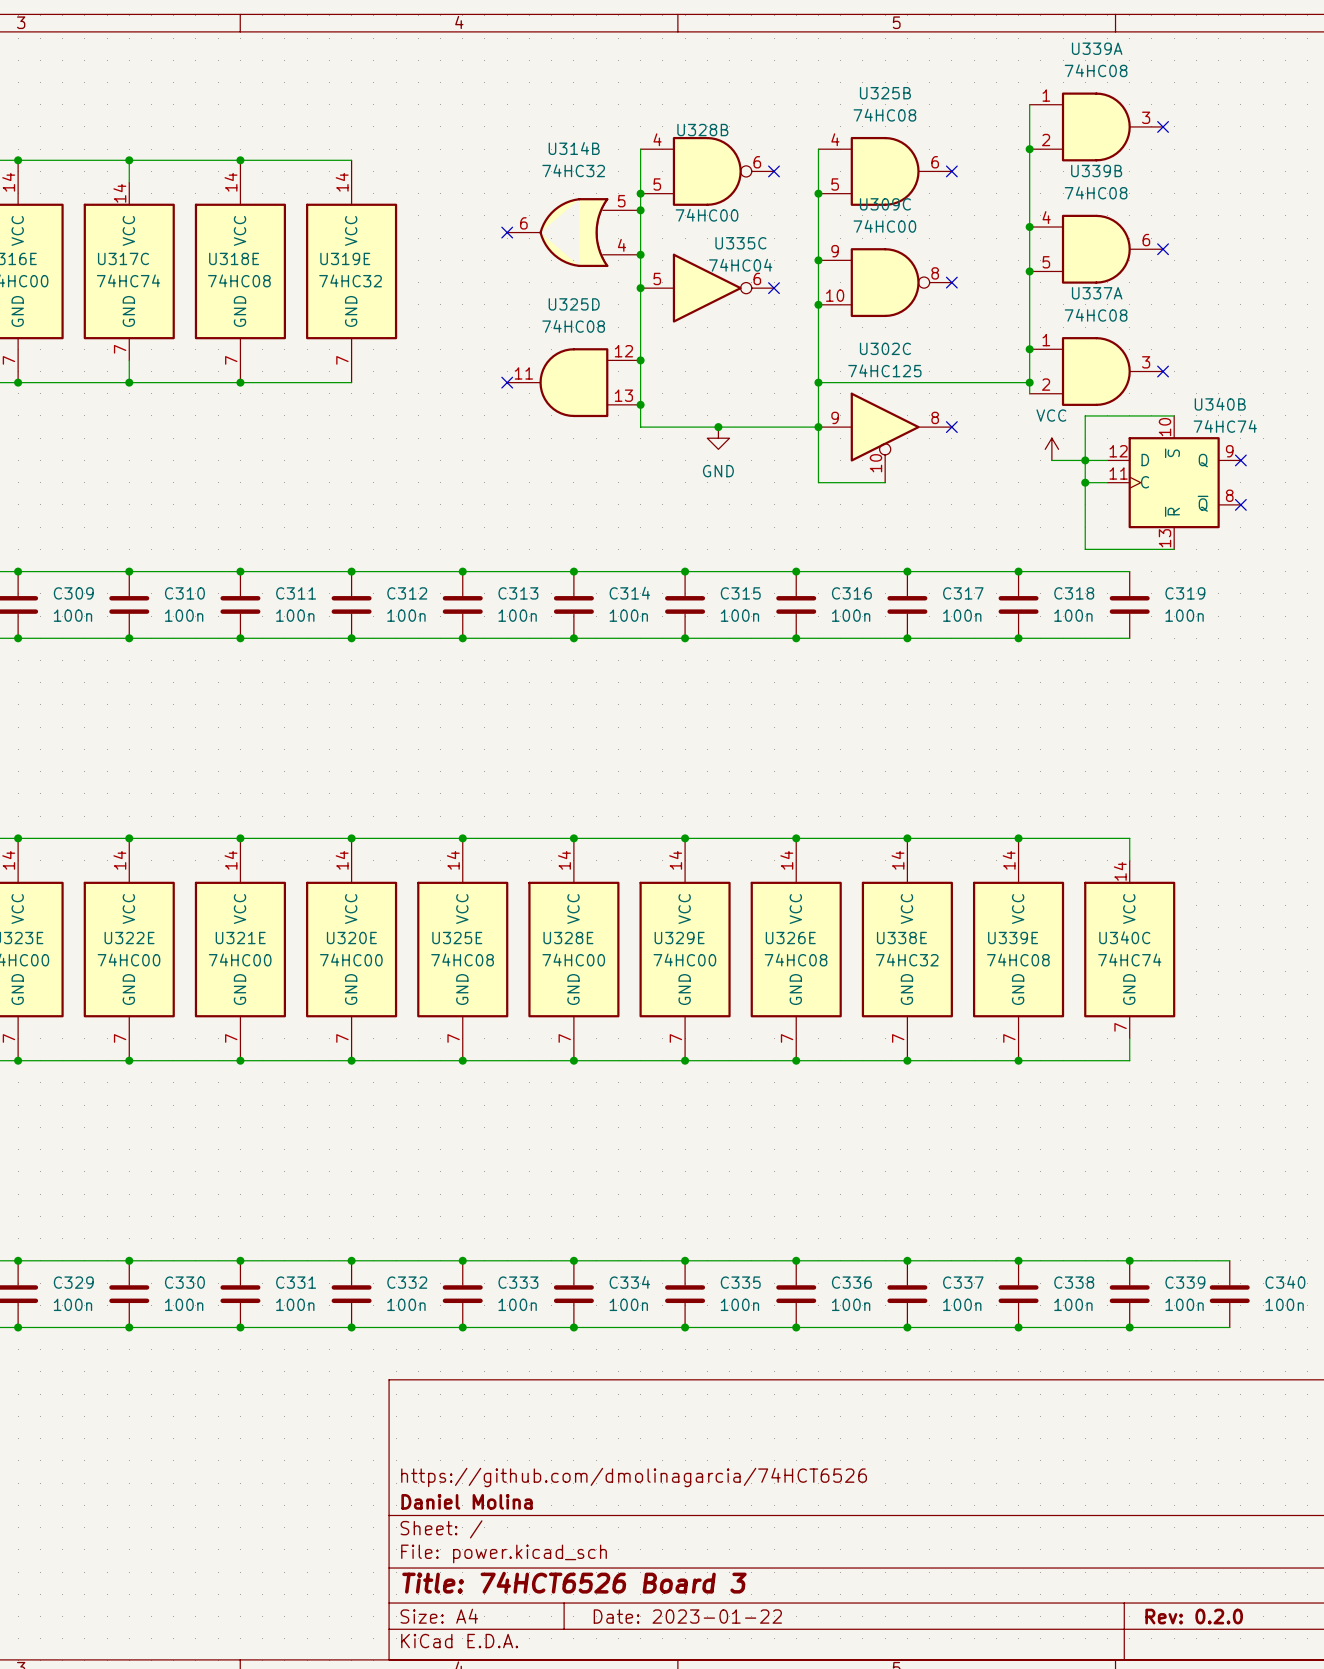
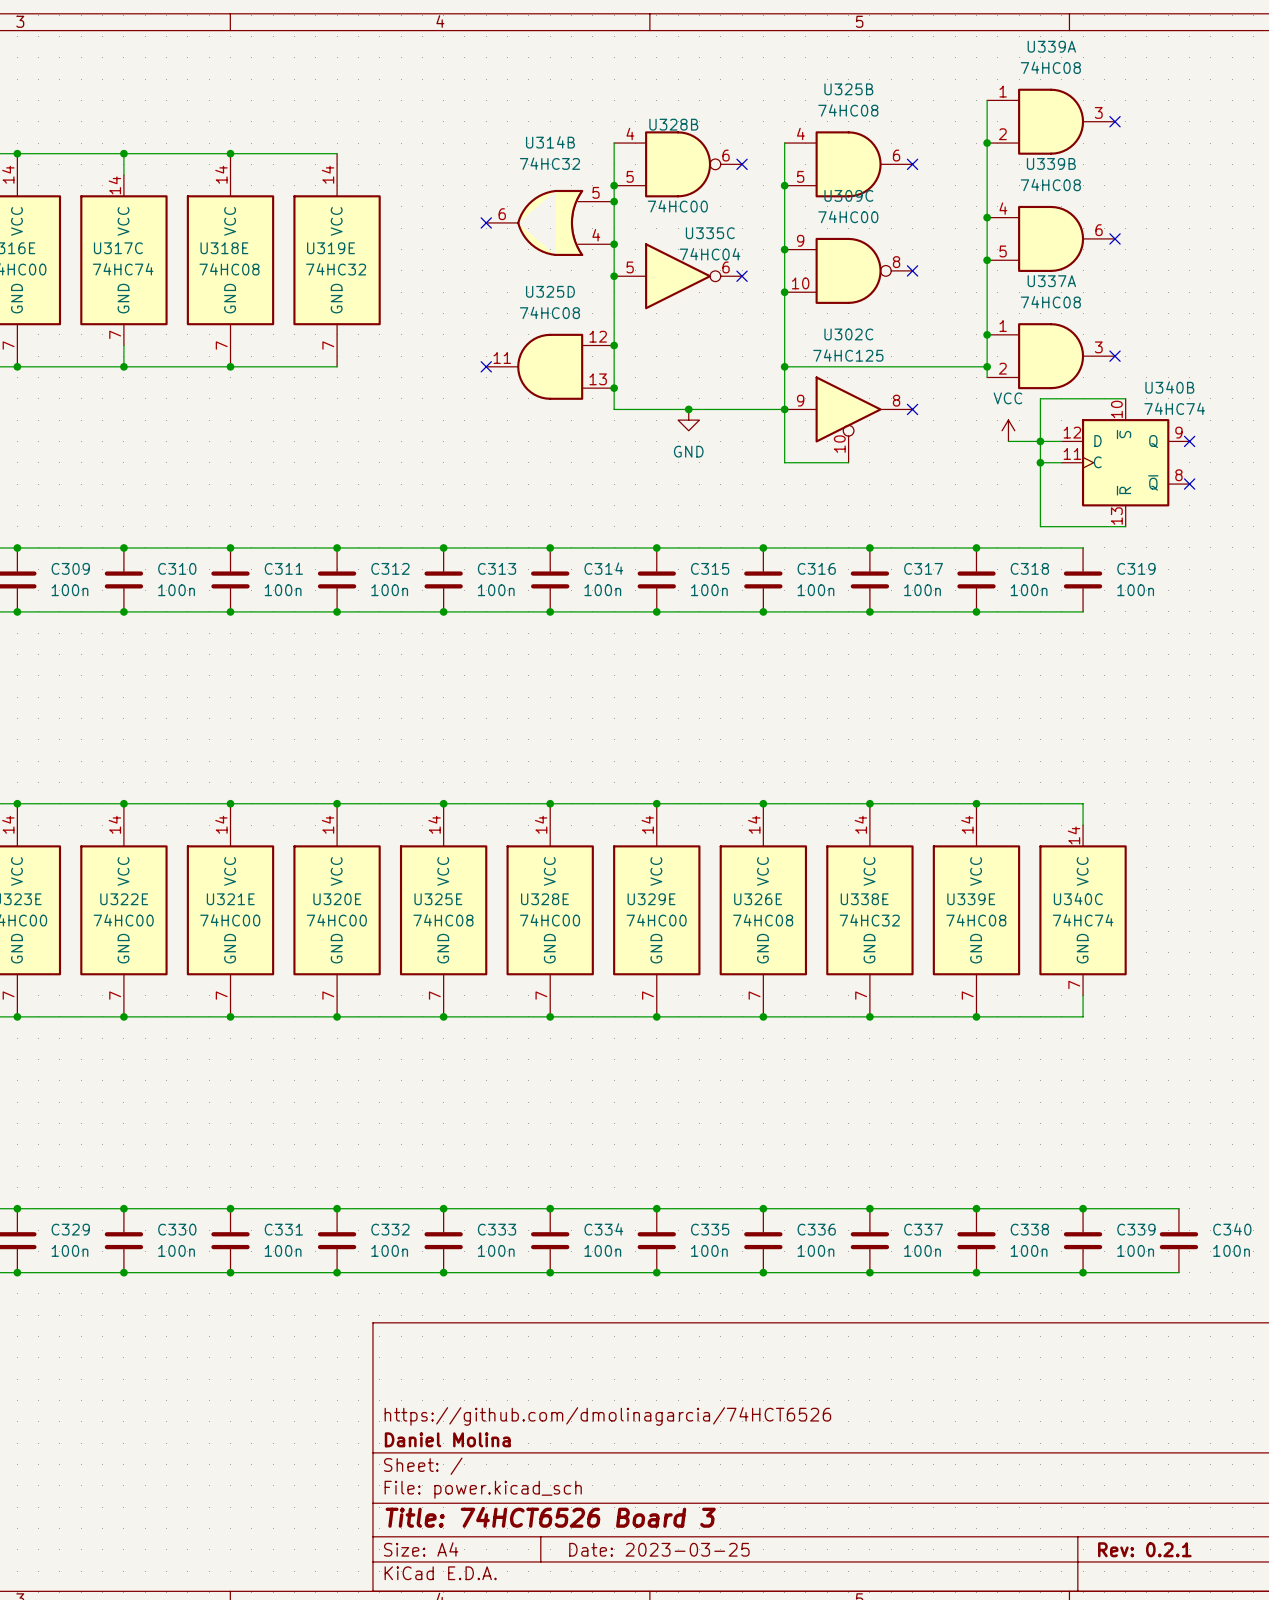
title block: Date: 2023-01-22 (687, 1616) -> Date: 2023-03-25 (659, 1549)
title block: Rev: 0.2.0 (1194, 1616) -> Rev: 0.2.1 (1144, 1549)

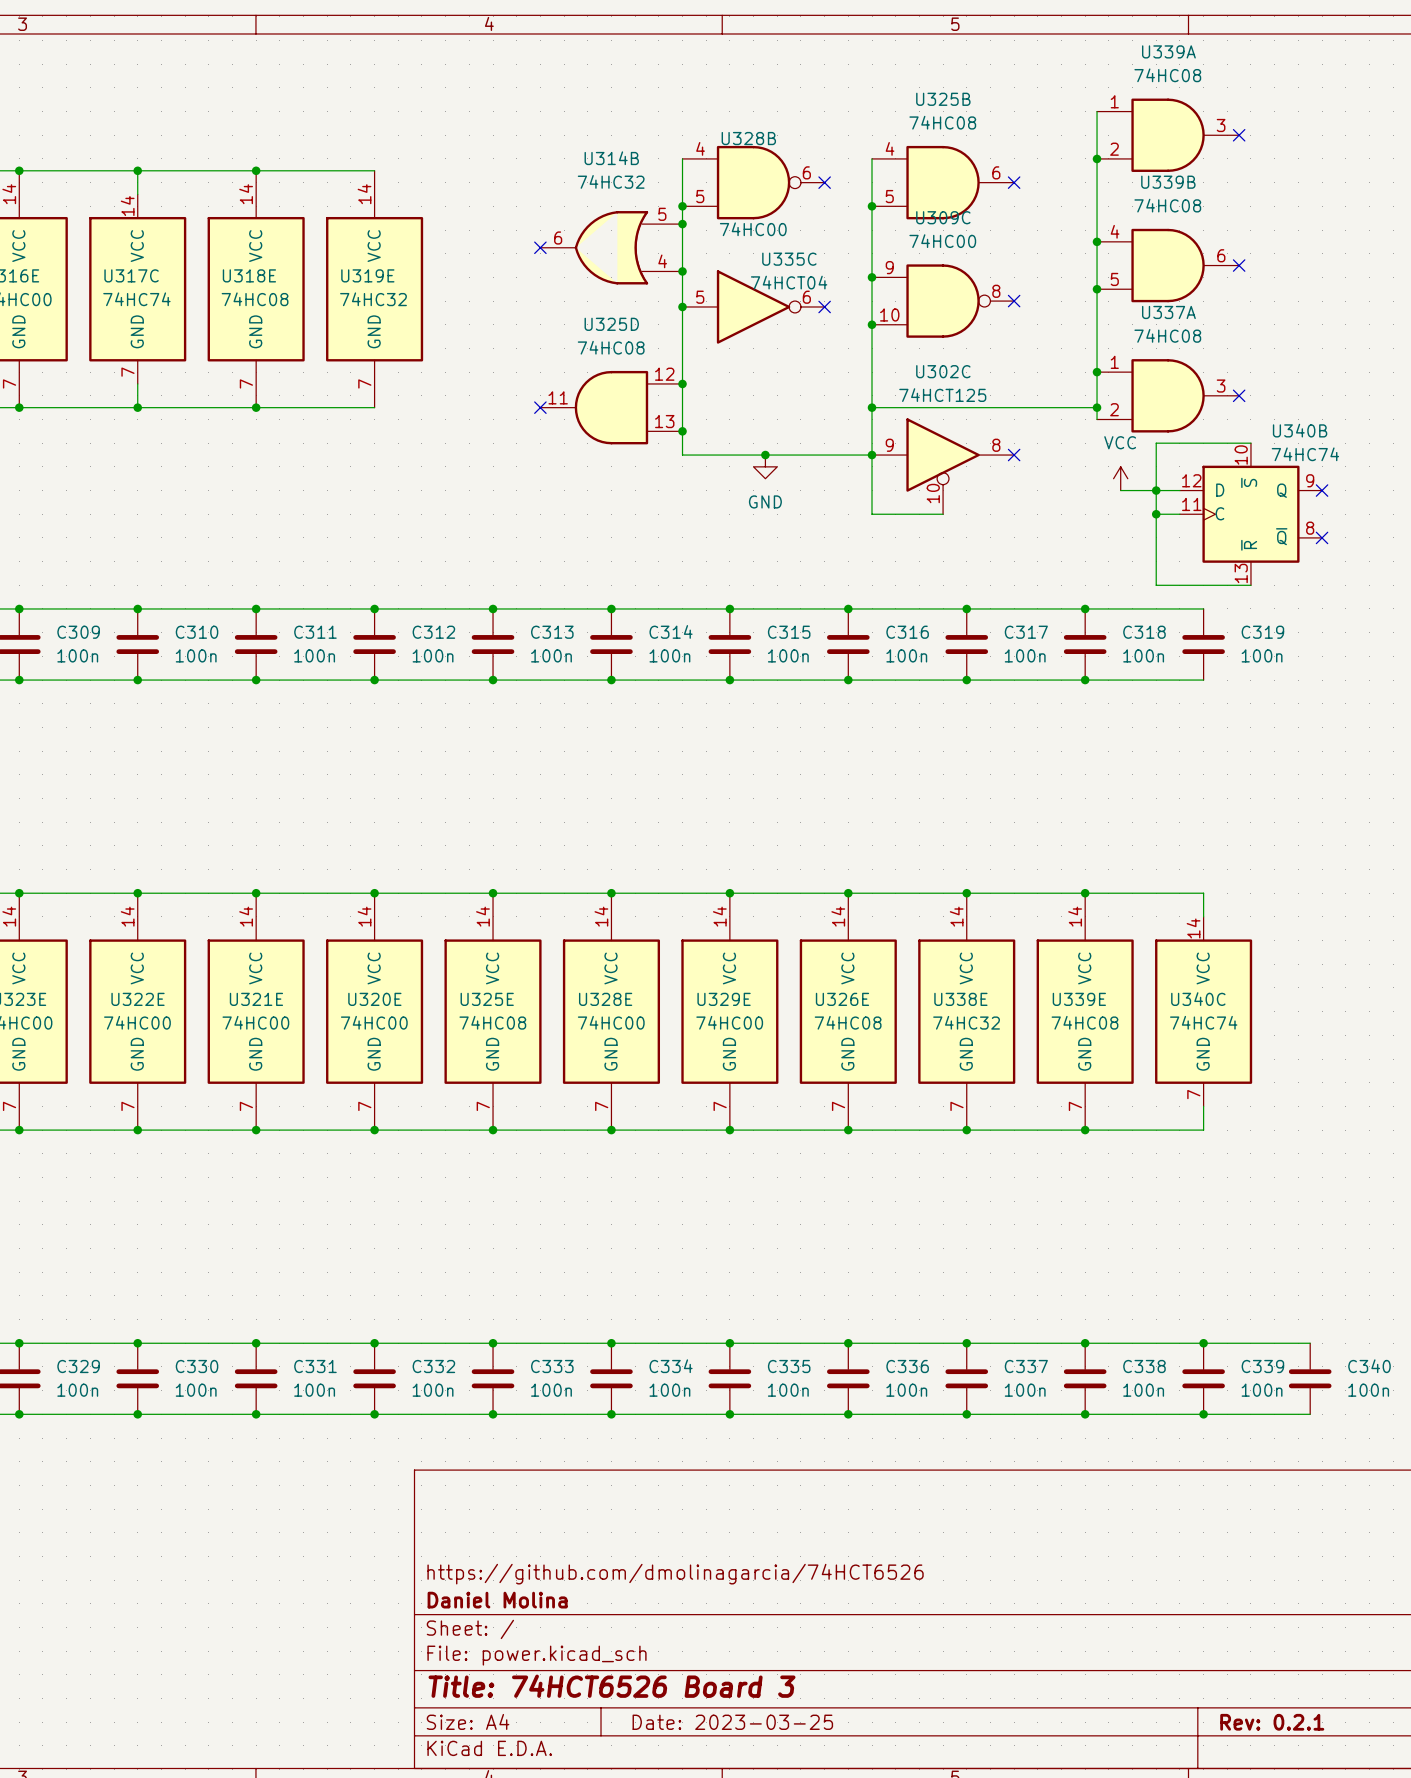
U335C value: 74HC04 (710, 254) -> 74HCT04 (789, 282)
U302C value: 74HC125 (848, 355) -> 74HCT125 (942, 395)

